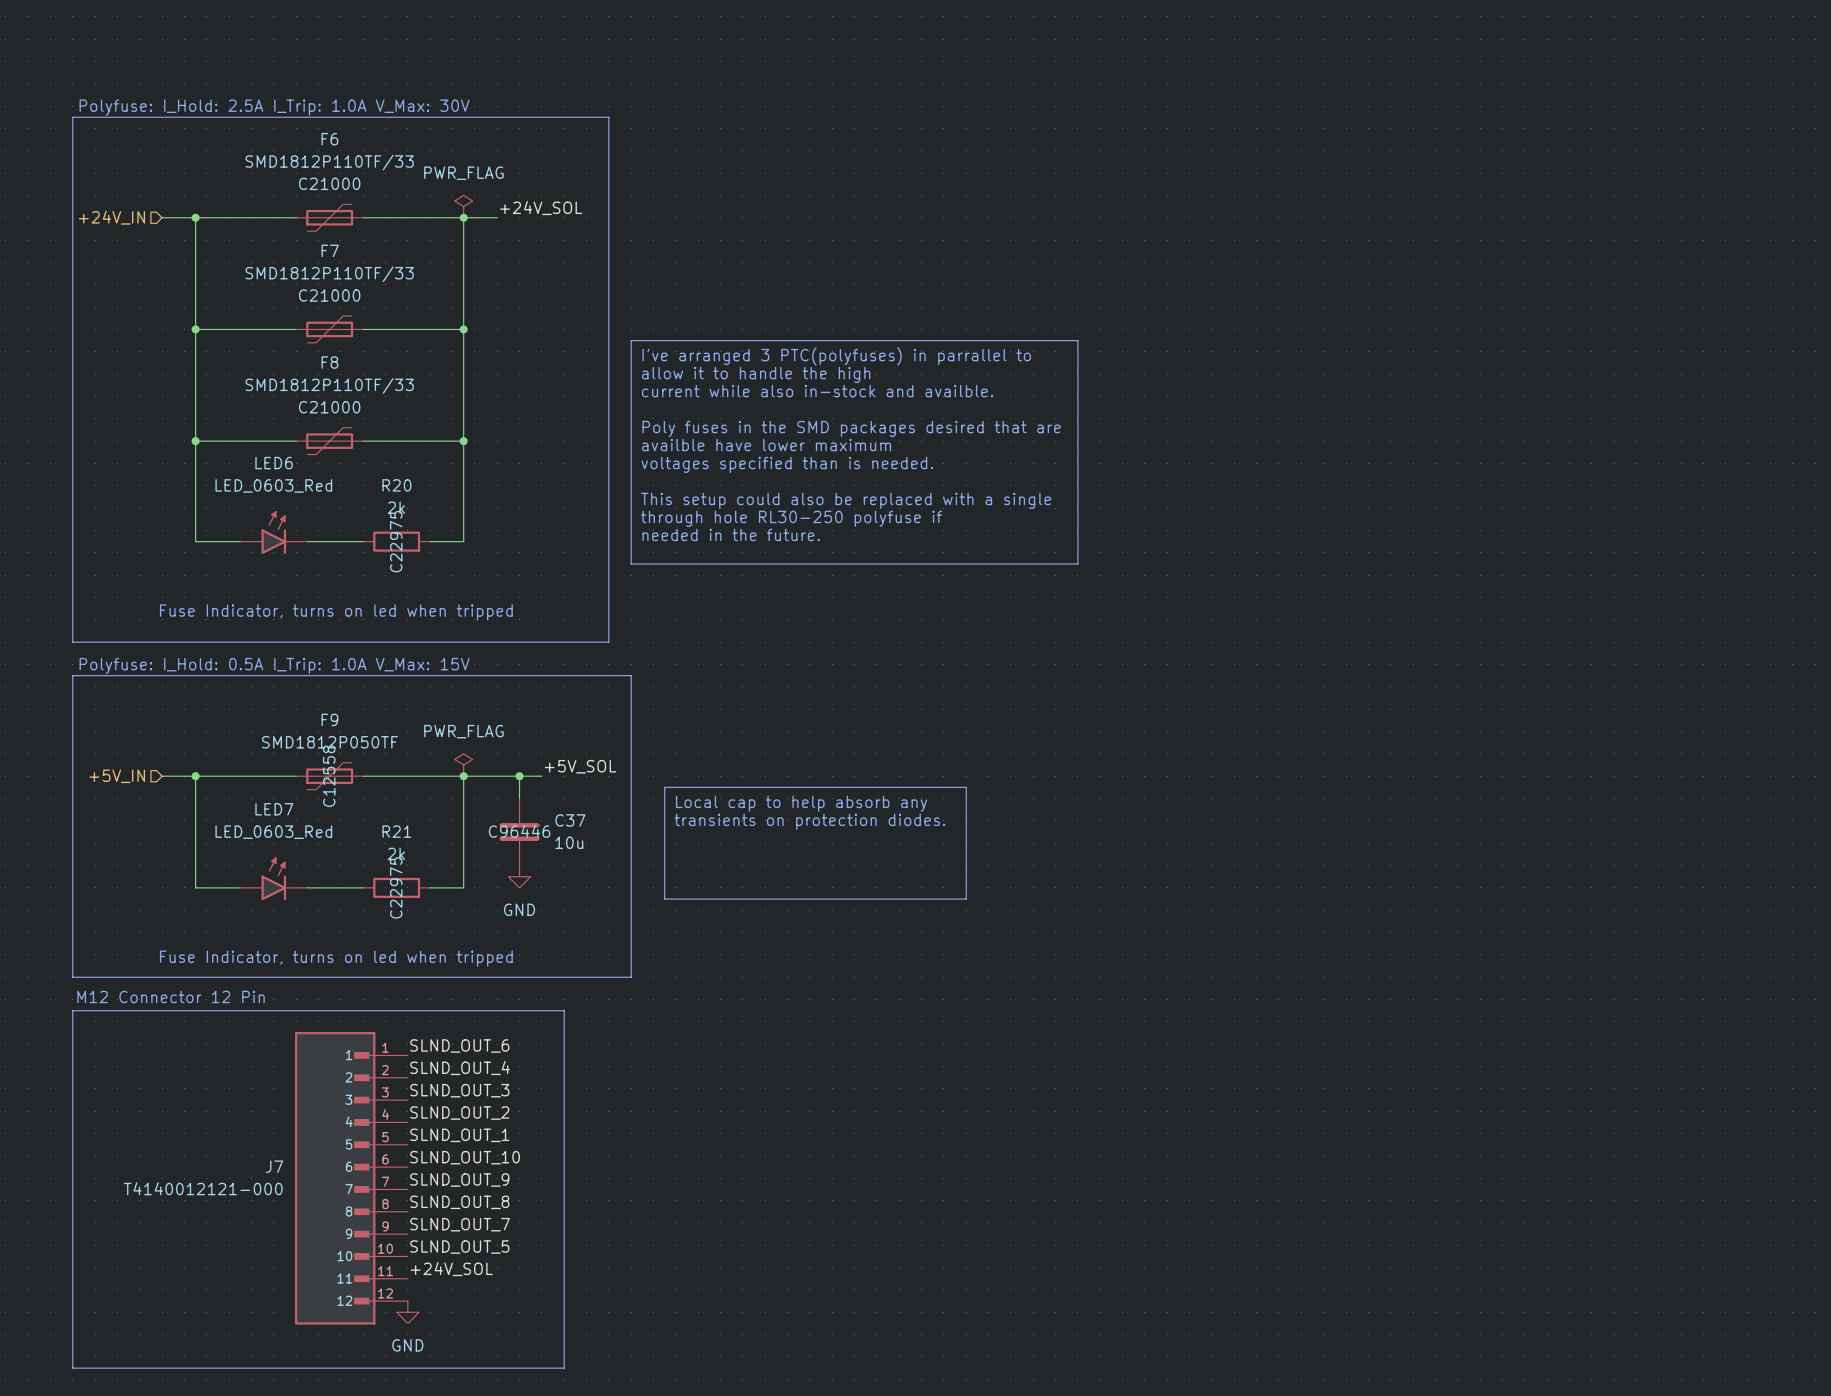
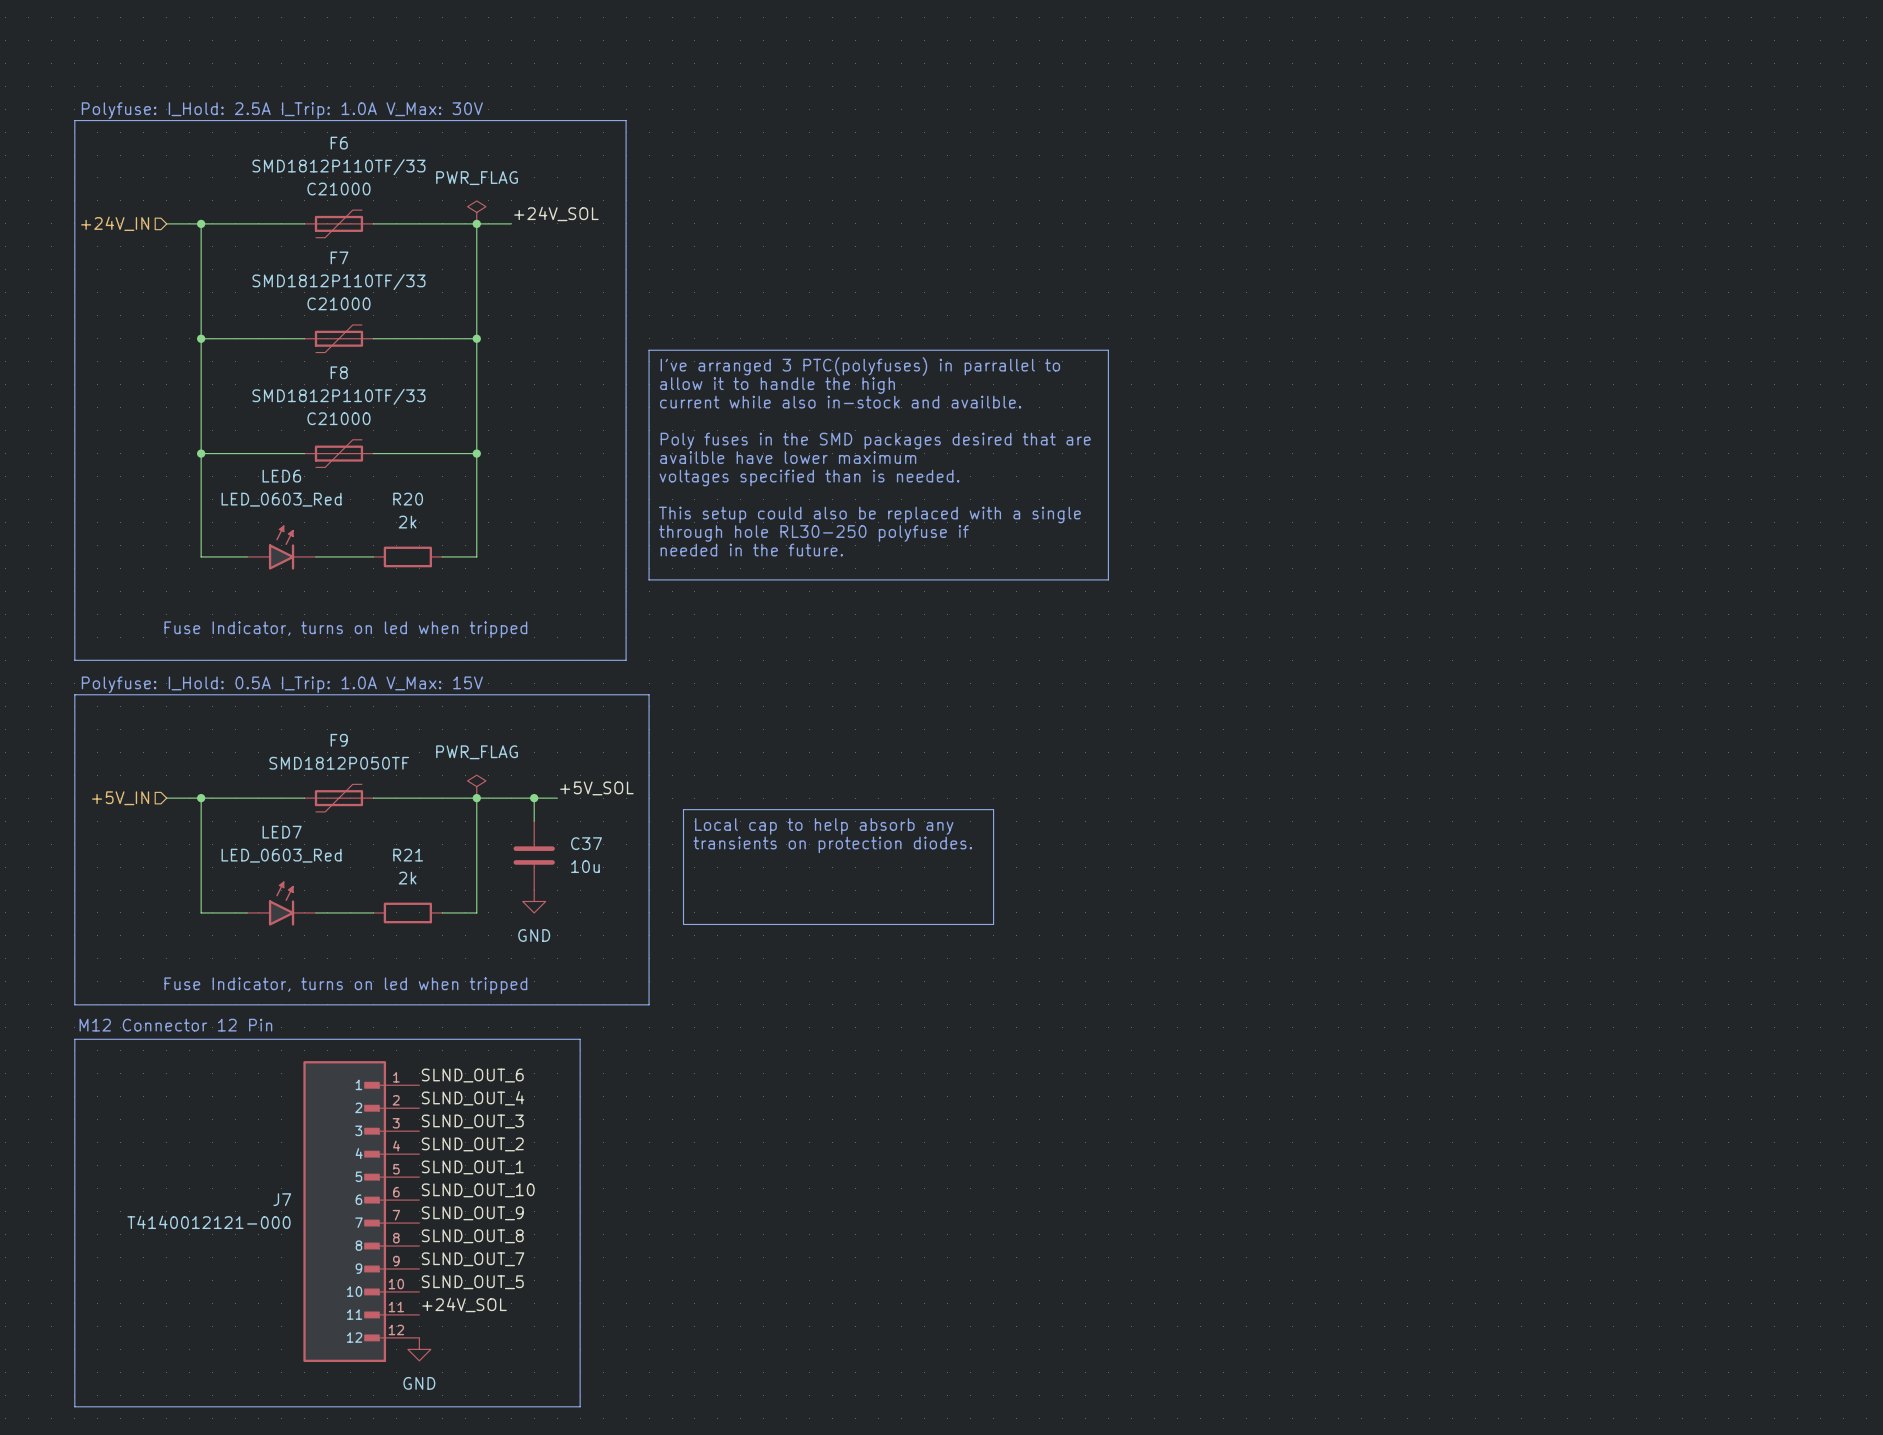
R20 text: C22975 (396, 541) -> none
F9 text: C12558 (329, 776) -> none
C37 text: C96446 (519, 831) -> none
R21 text: C22975 (396, 887) -> none

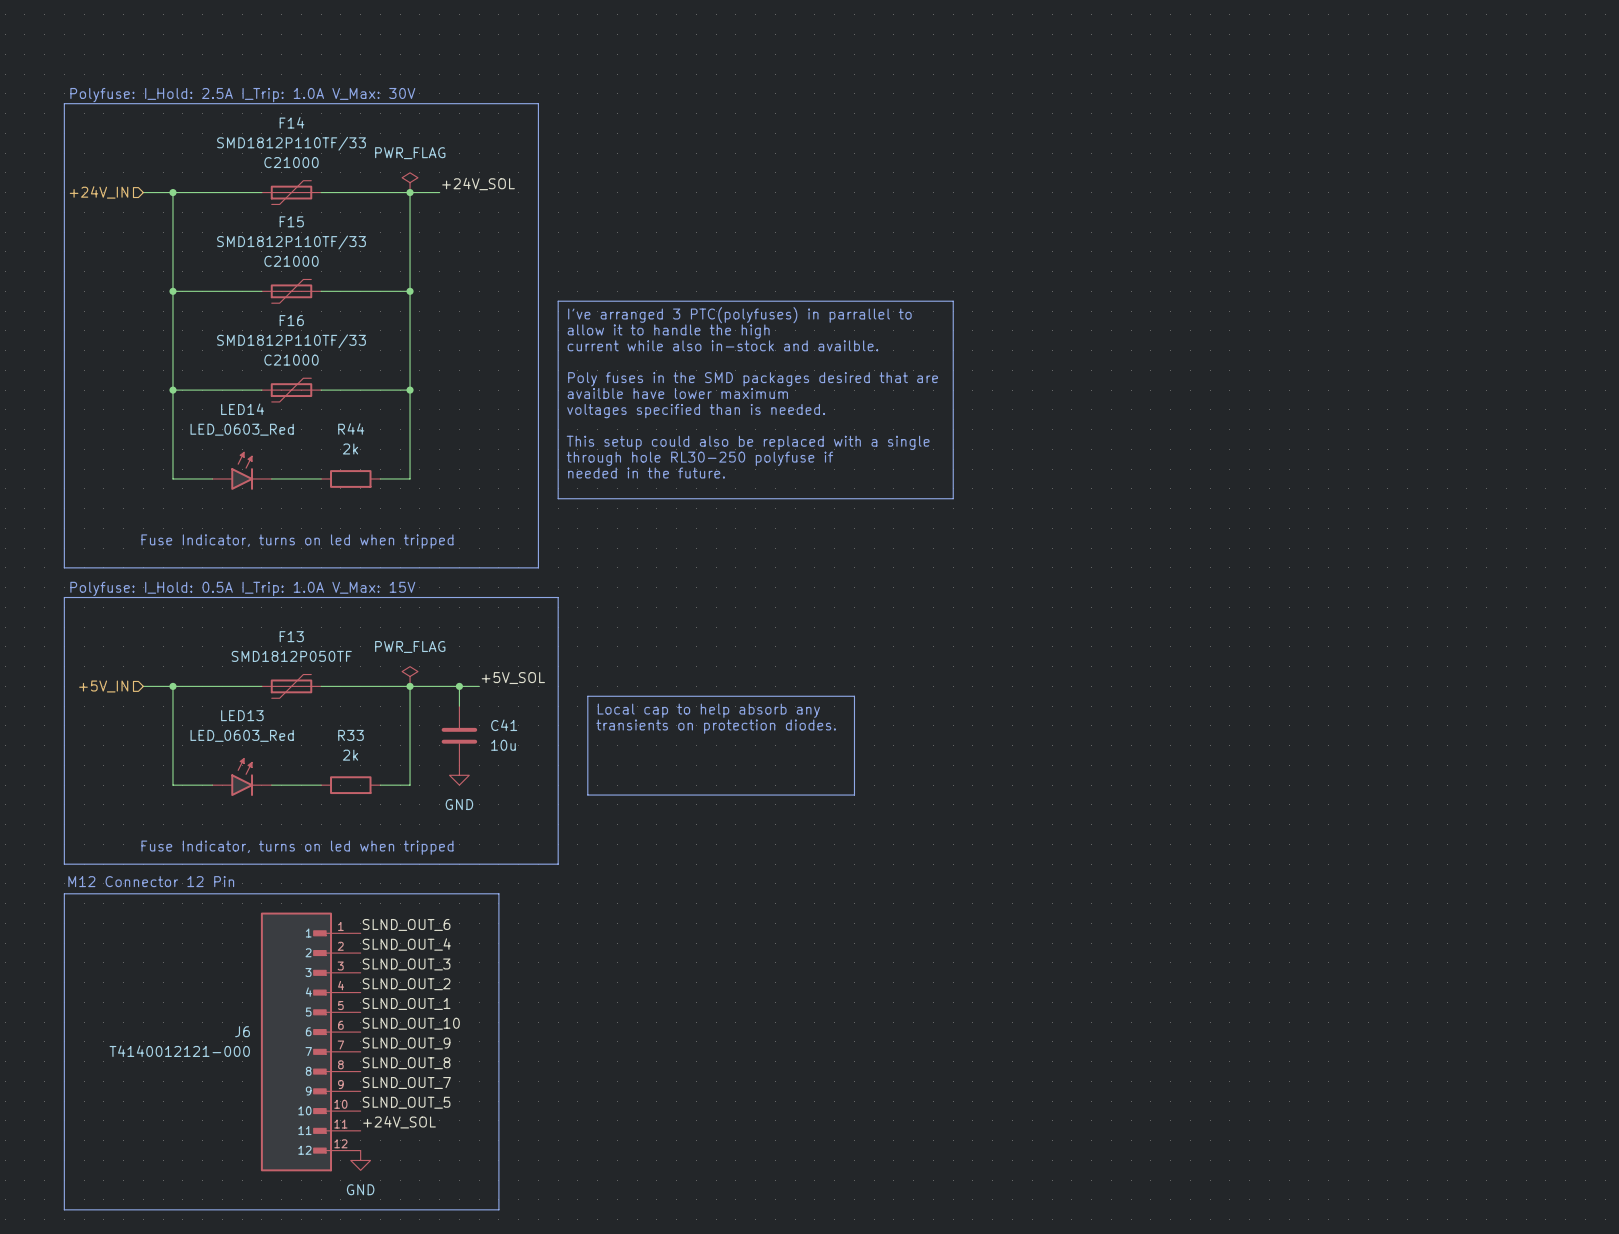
F6 name: F6 (339, 143) -> F14 (291, 122)
F7 name: F7 (339, 257) -> F15 (291, 221)
F8 name: F8 (339, 372) -> F16 (291, 320)
LED6 name: LED6 (281, 476) -> LED14 (242, 409)
R20 name: R20 (408, 499) -> R44 (351, 429)
F9 name: F9 (339, 740) -> F13 (291, 636)
LED7 name: LED7 (282, 832) -> LED13 (242, 715)
C37 name: C37 (586, 843) -> C41 (504, 725)
R21 name: R21 (408, 855) -> R33 (351, 735)
J7 name: J7 (282, 1199) -> J6 (242, 1031)

